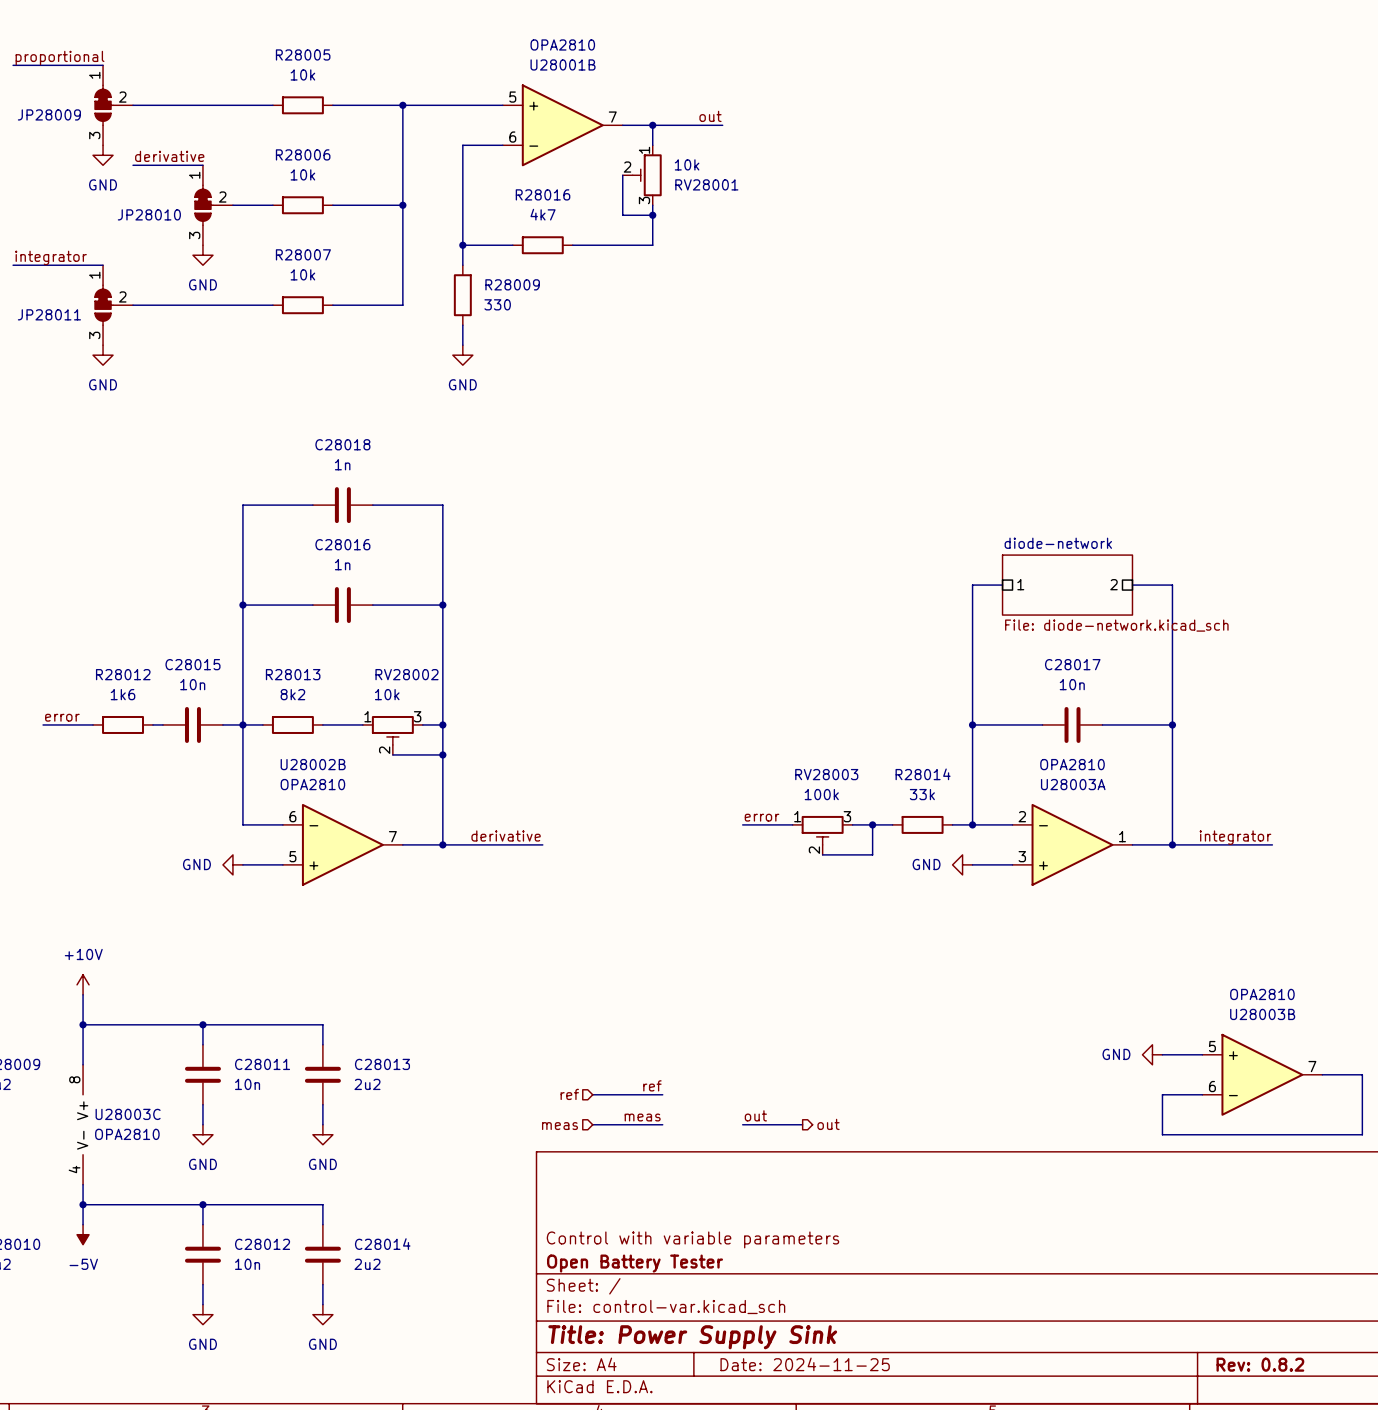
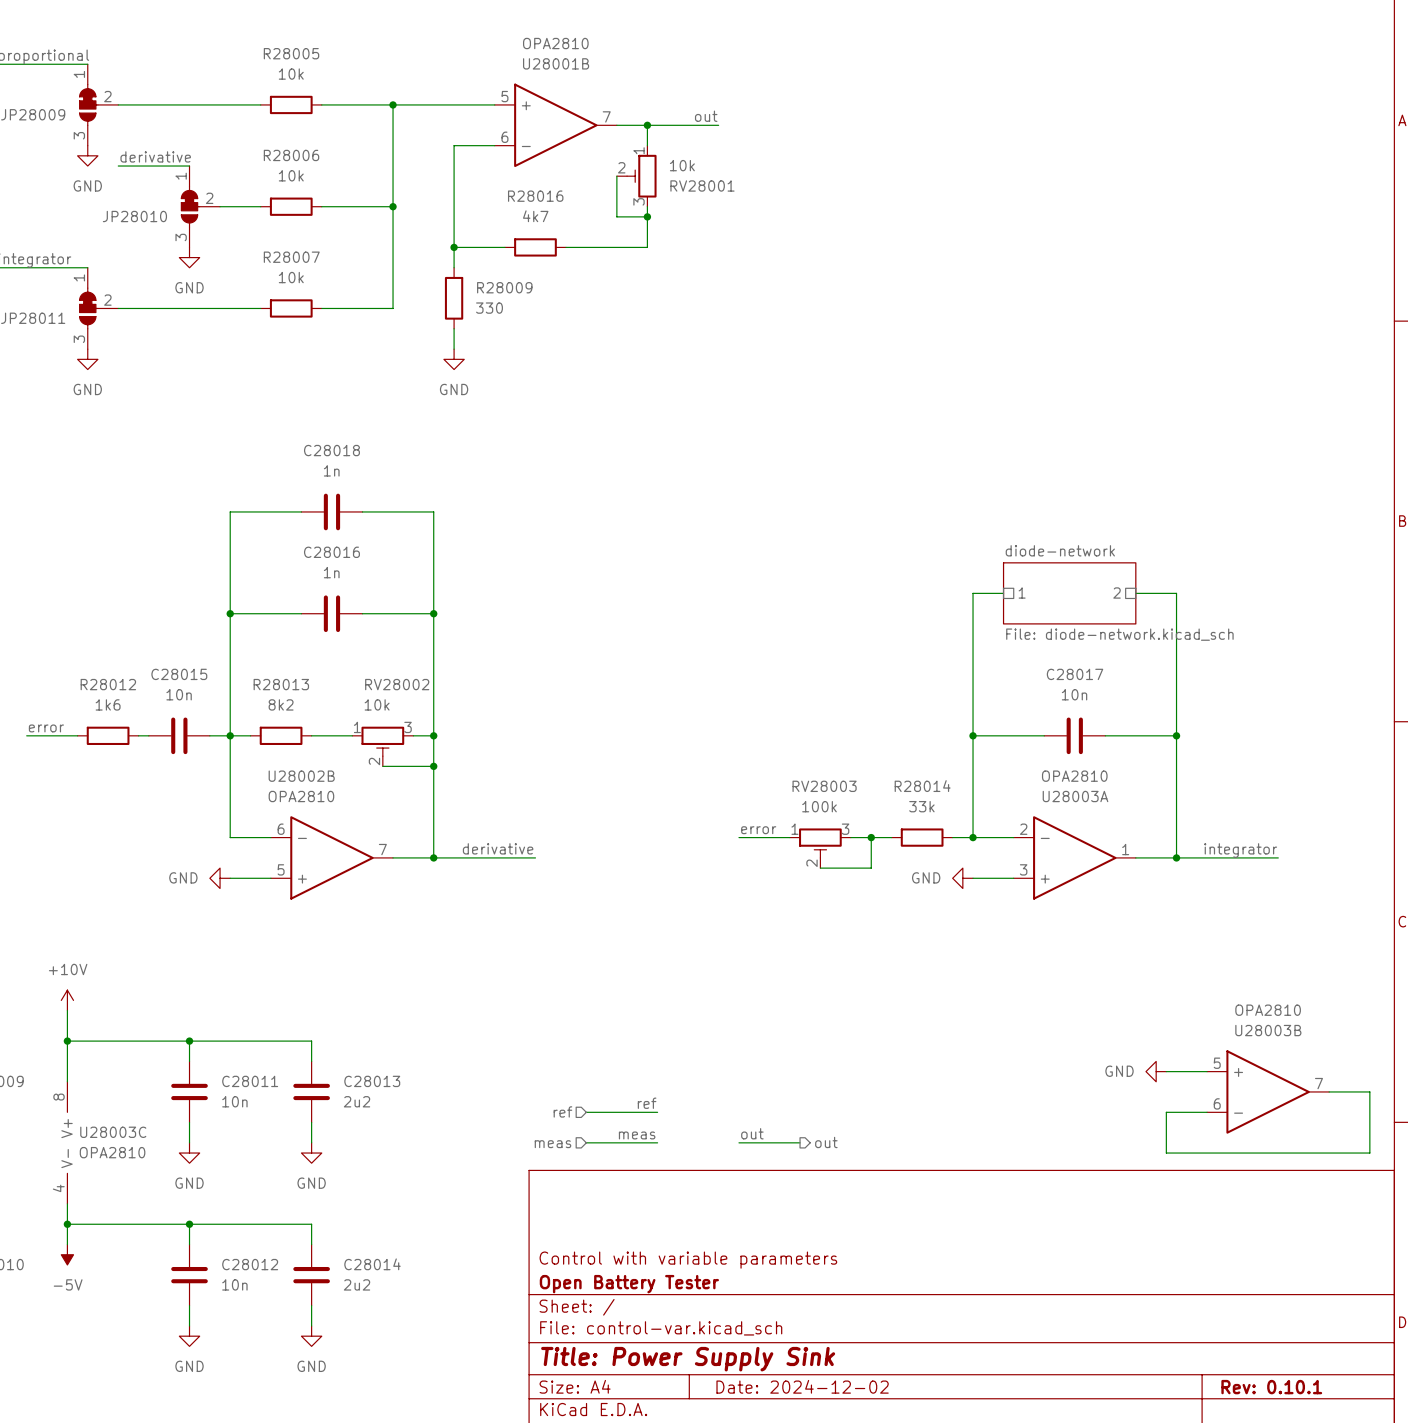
title block: Date: 2024-11-25 (805, 1364) -> Date: 2024-12-02 (802, 1386)
title block: Rev: 0.8.2 (1260, 1364) -> Rev: 0.10.1 (1271, 1387)

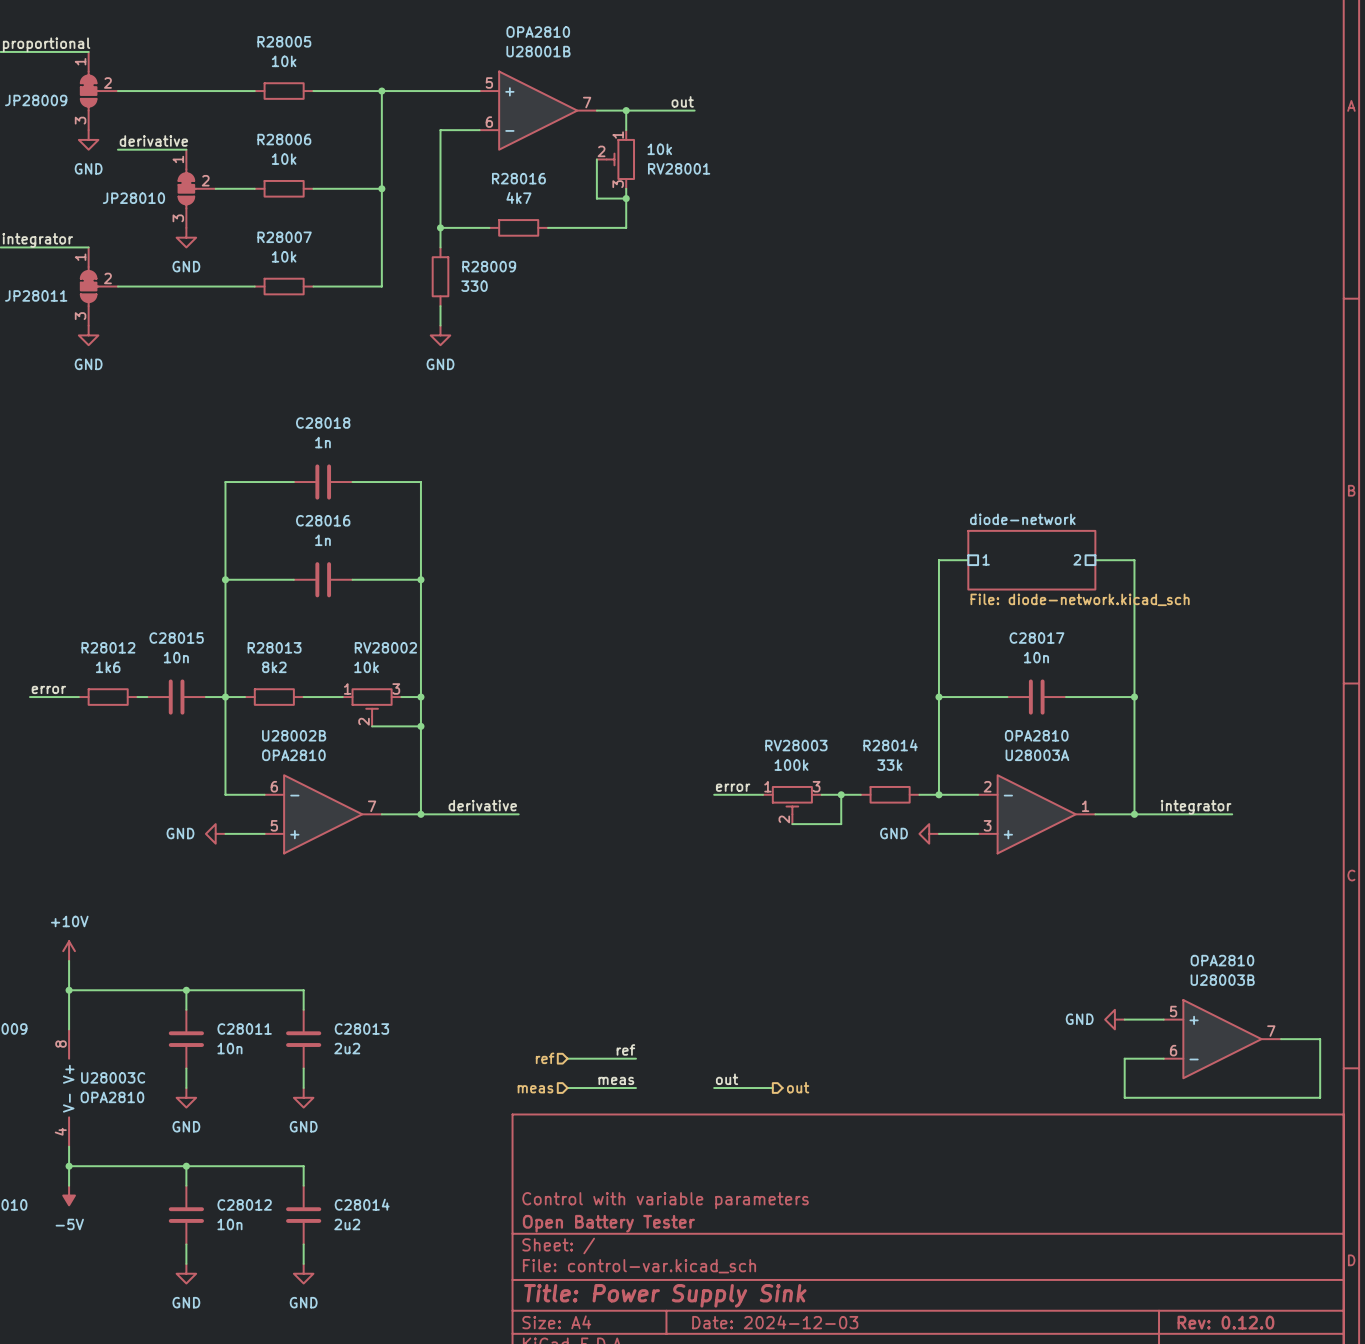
title block: Date: 2024-12-02 (802, 1386) -> Date: 2024-12-03 (775, 1322)
title block: Rev: 0.10.1 (1271, 1387) -> Rev: 0.12.0 (1225, 1322)

